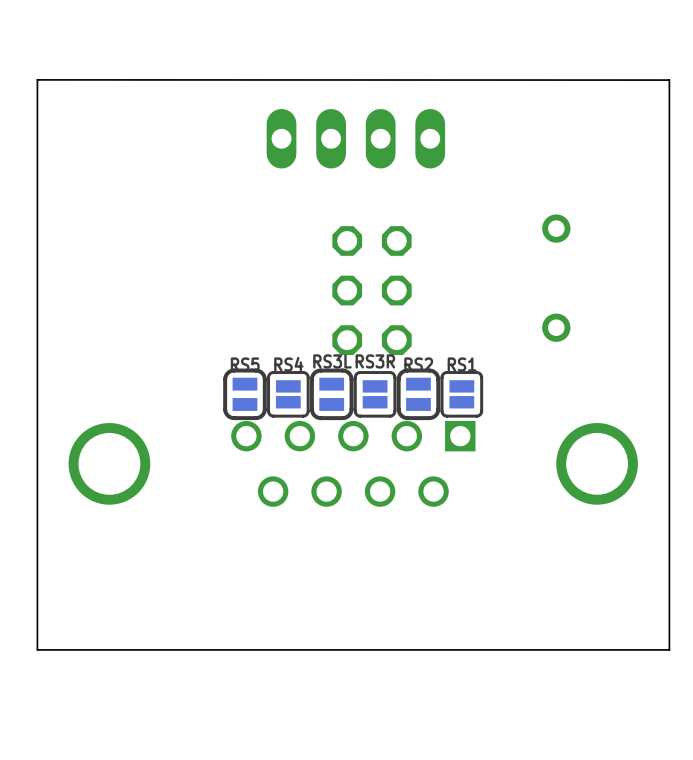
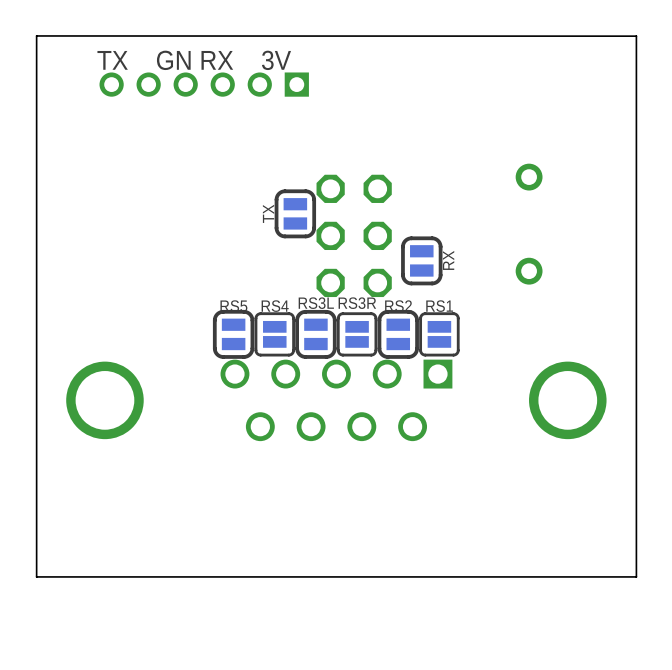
text: none -> TX GN RX 3V (194, 60)
part: none -> (204, 84)
part: (355, 138) -> none
TX: none -> (295, 213)
RX: none -> (421, 260)

